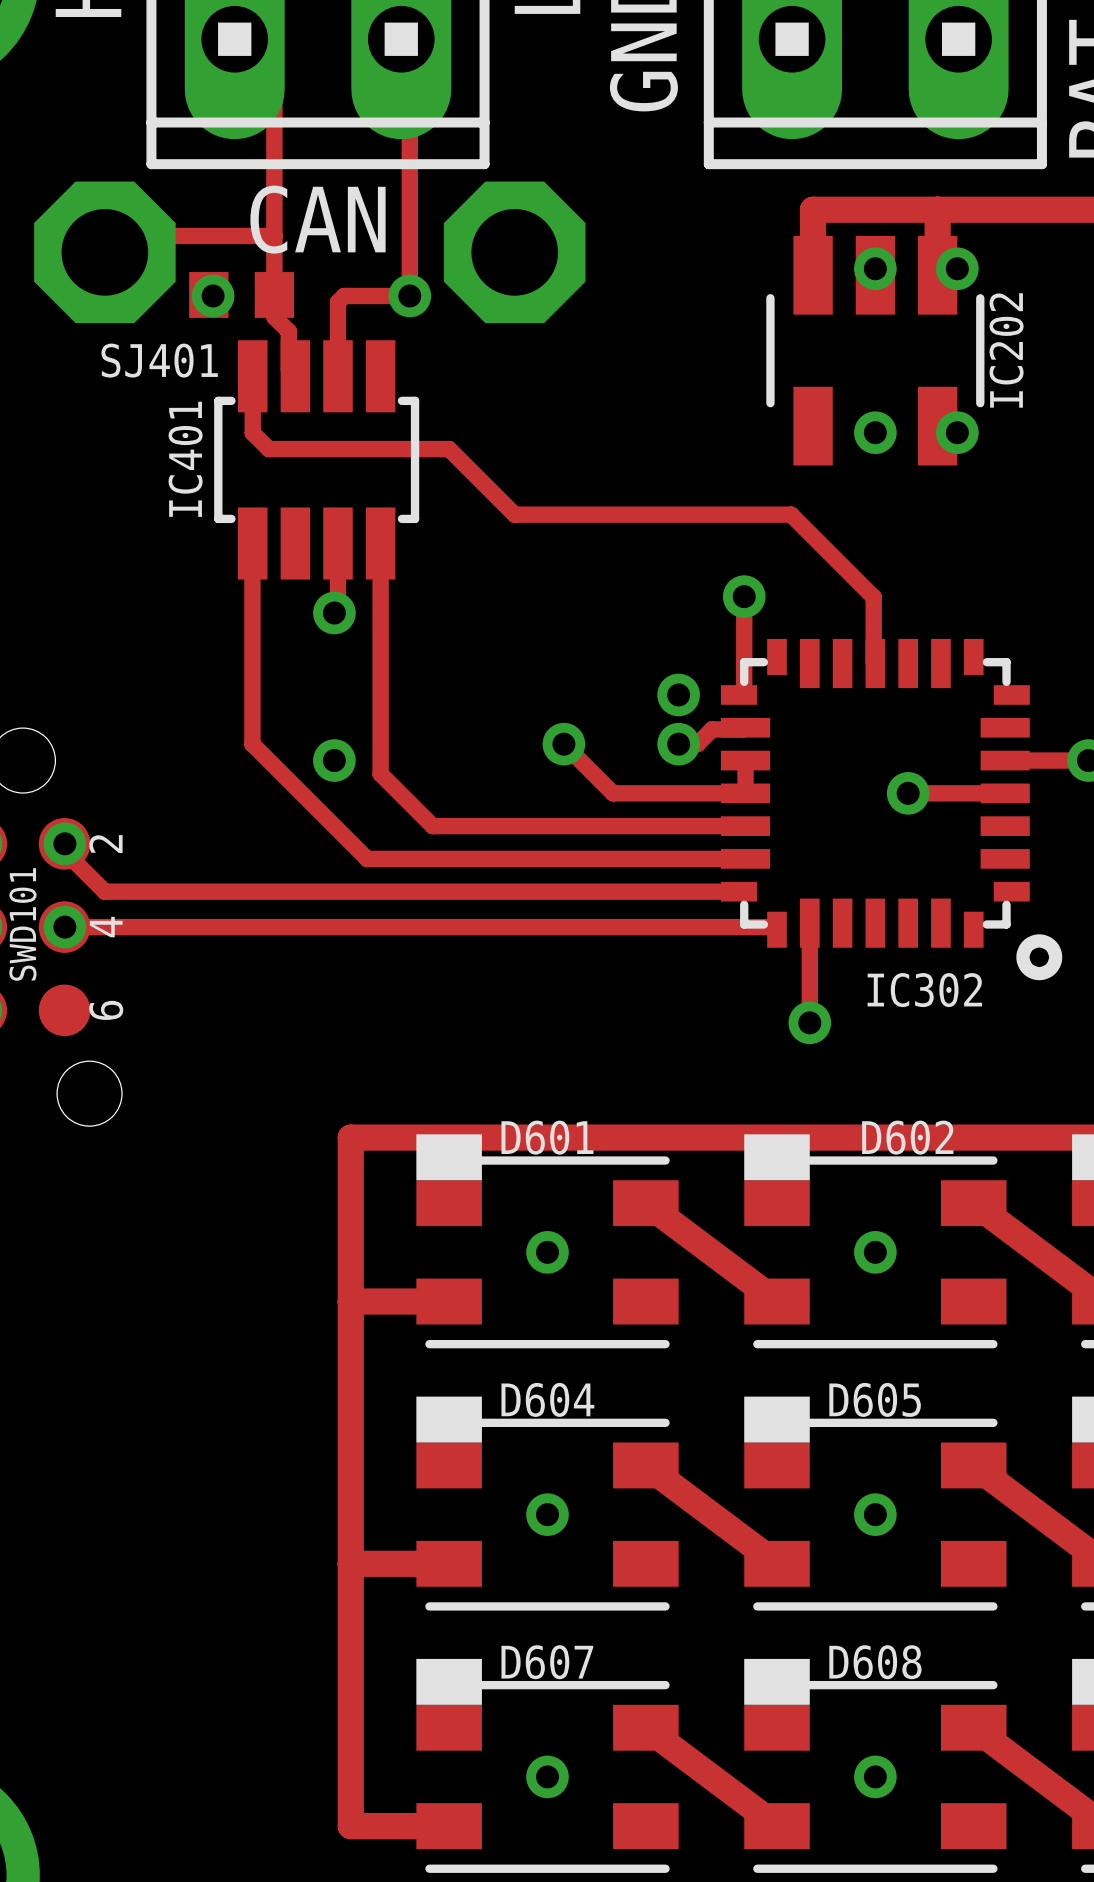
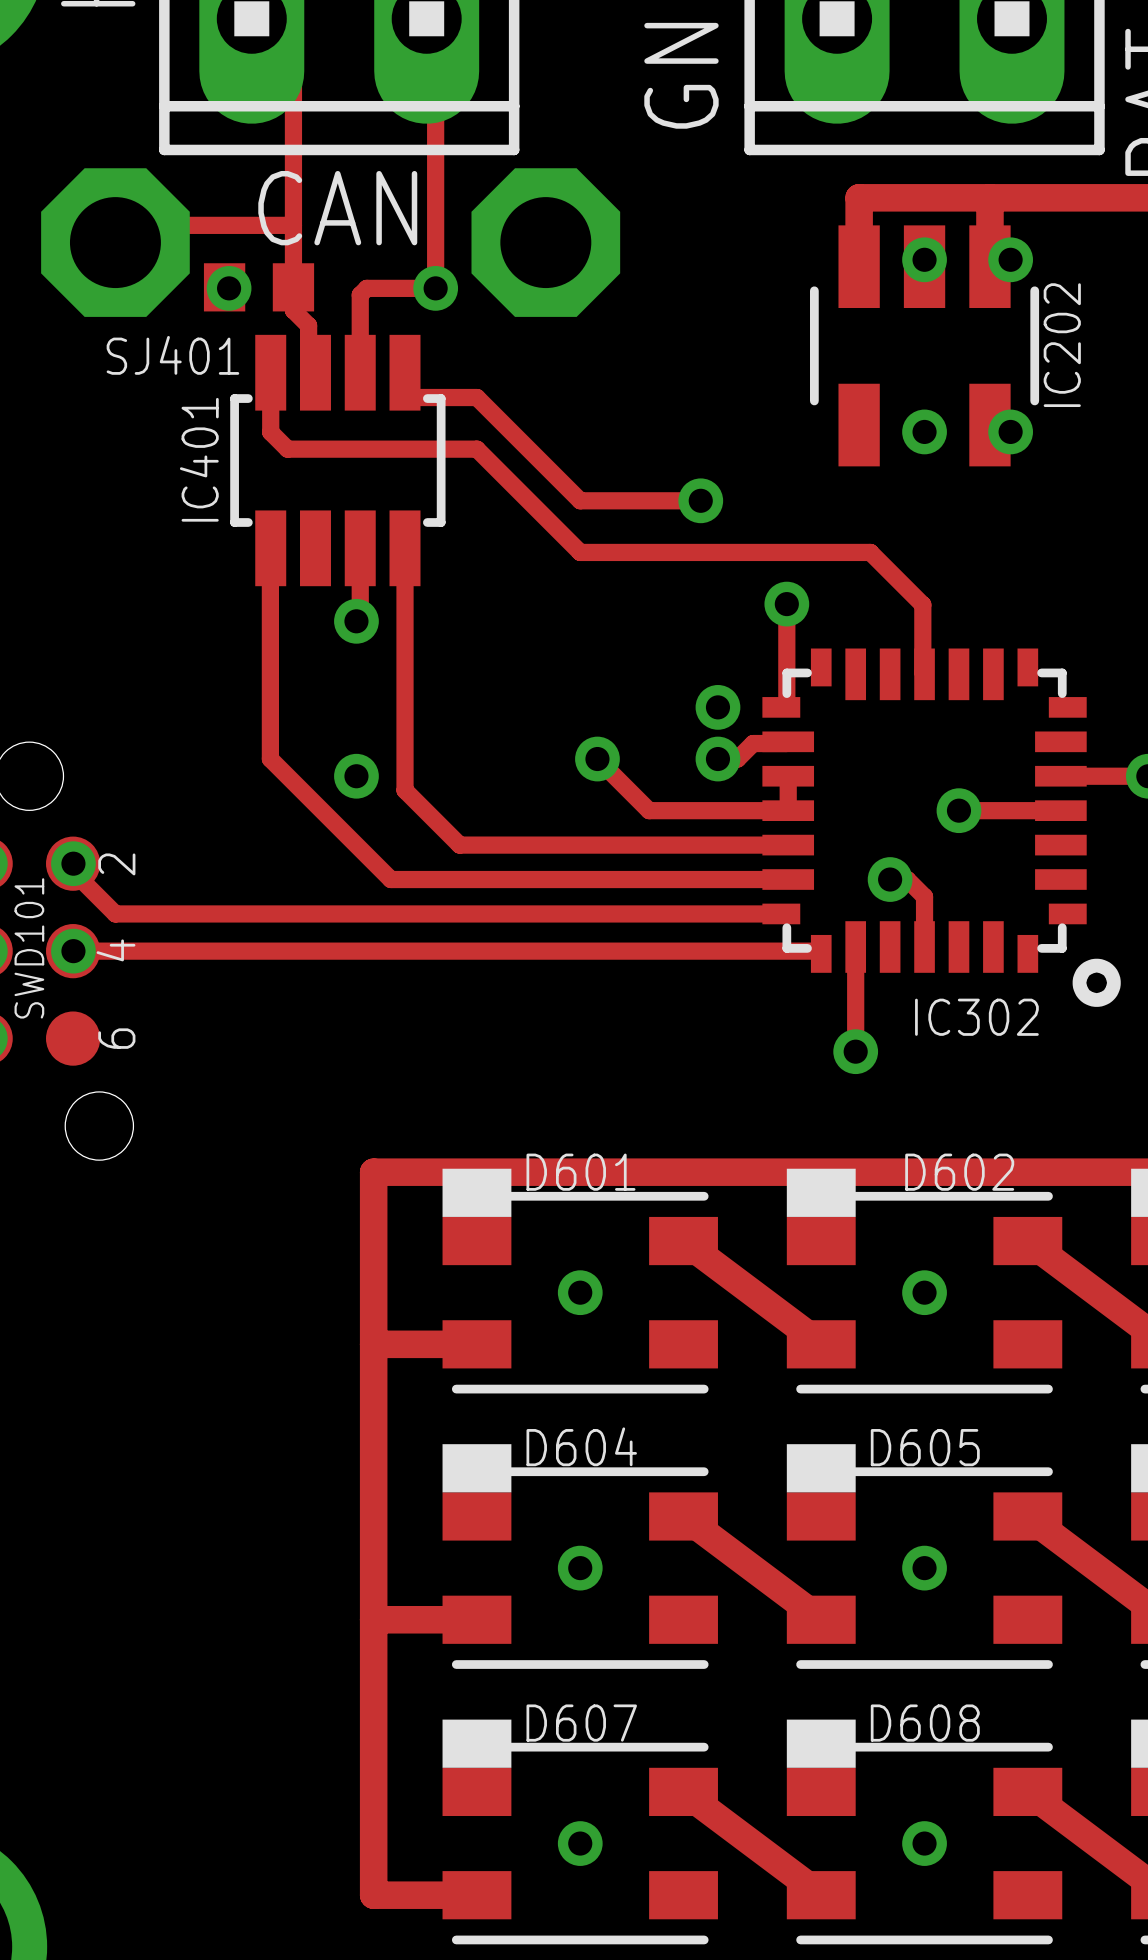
track: none -> (405, 372) (405, 389) (412, 397) (476, 397) (580, 500) (700, 500)
via: none -> (700, 500)
track: (514, 514) (791, 514) (823, 547) -> (545, 518) (580, 552) (870, 552)
track: none -> (890, 879) (907, 879) (924, 896) (924, 947)
via: none -> (890, 879)

